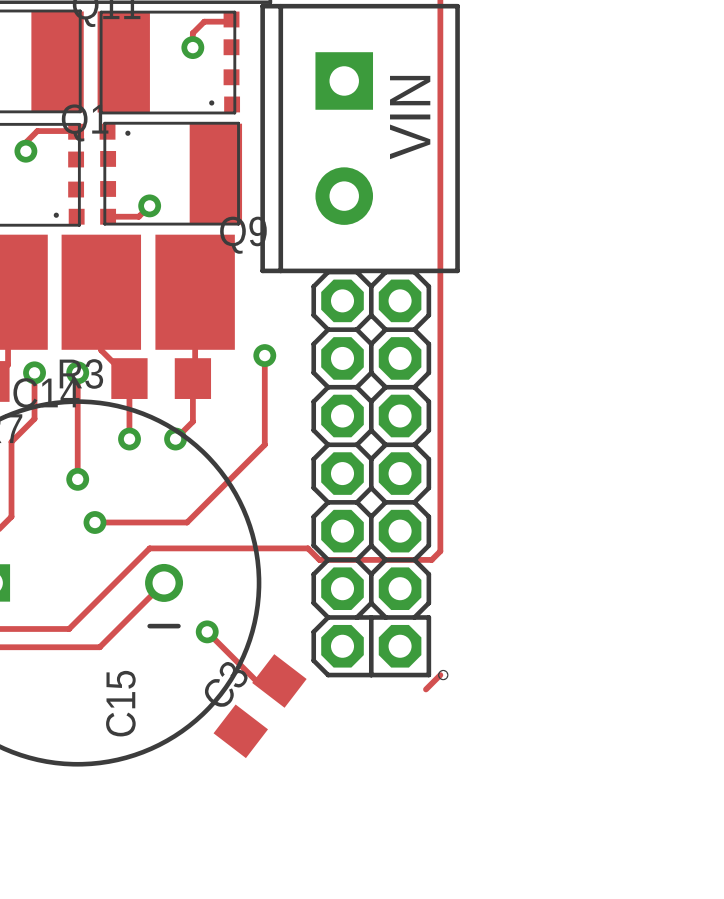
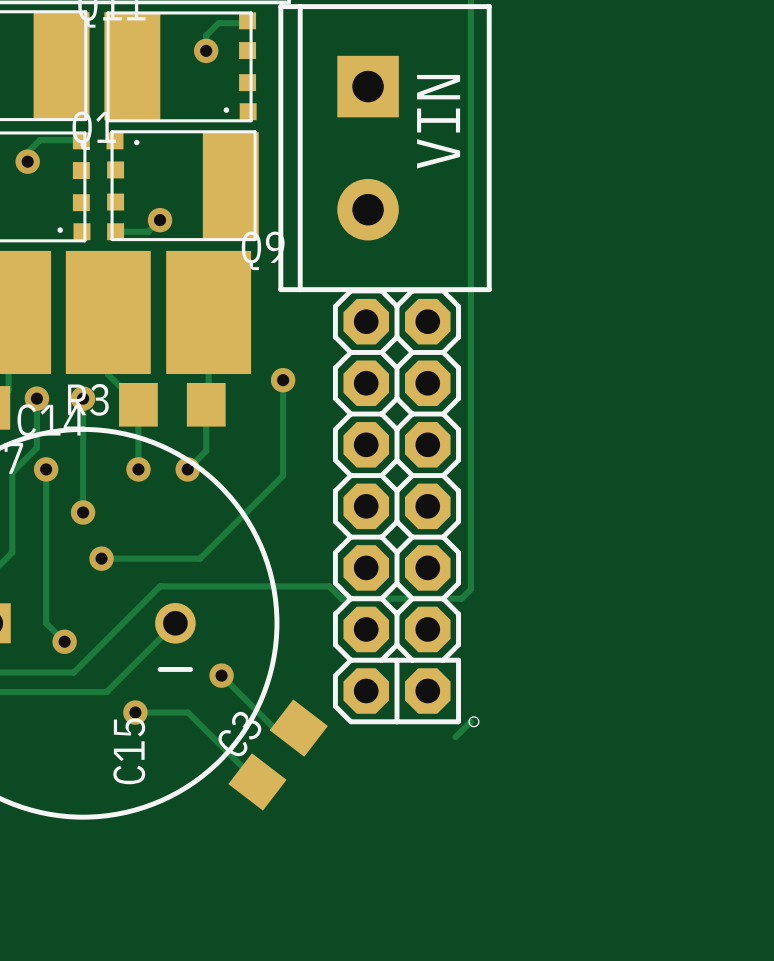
track: none -> (46, 469) (46, 623) (64, 641)
via: none -> (46, 469)
via: none -> (64, 641)
track: none -> (135, 712) (188, 712) (257, 781)
via: none -> (135, 712)

